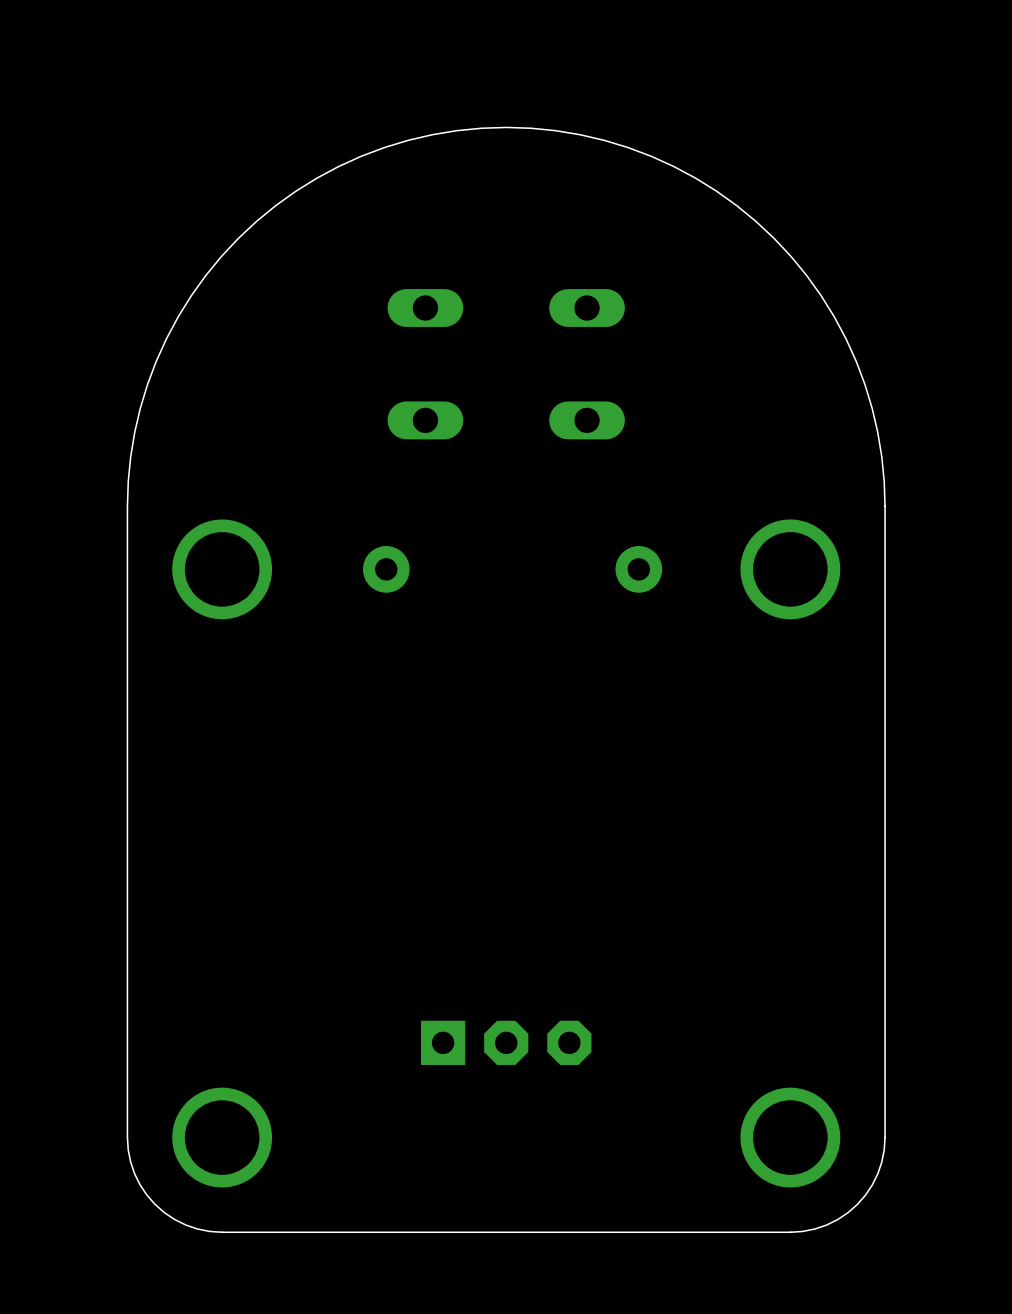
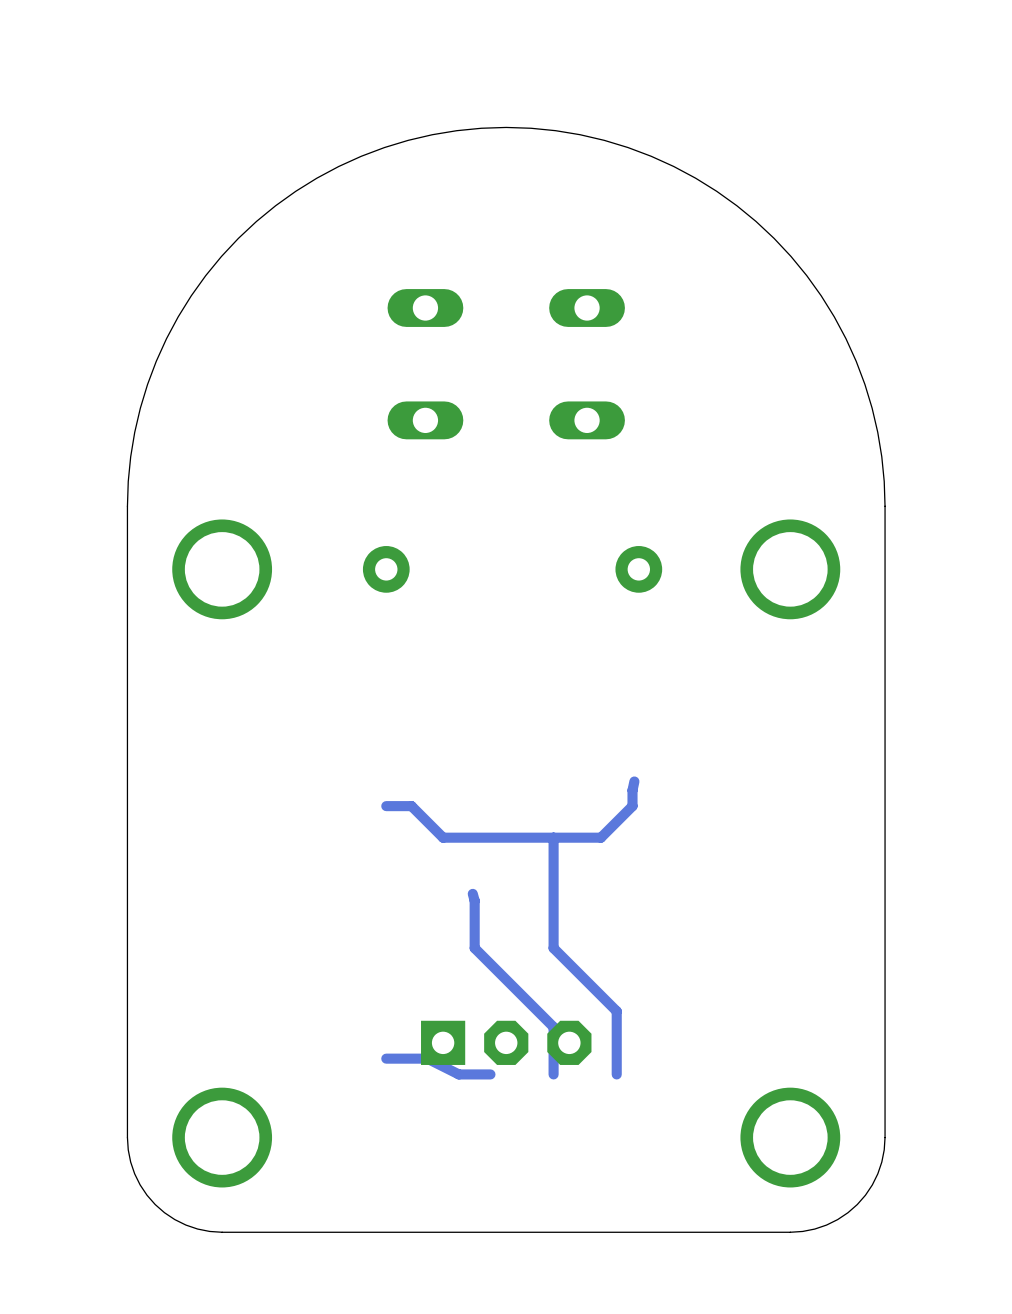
track: none -> (634, 781) (632, 806) (600, 837) (443, 837) (411, 806) (386, 806)
track: none -> (553, 837) (553, 948) (616, 1011) (616, 1074)
track: none -> (472, 893) (474, 900) (474, 948) (553, 1027) (553, 1074)
track: none -> (386, 1058) (427, 1058) (458, 1074) (490, 1074)

